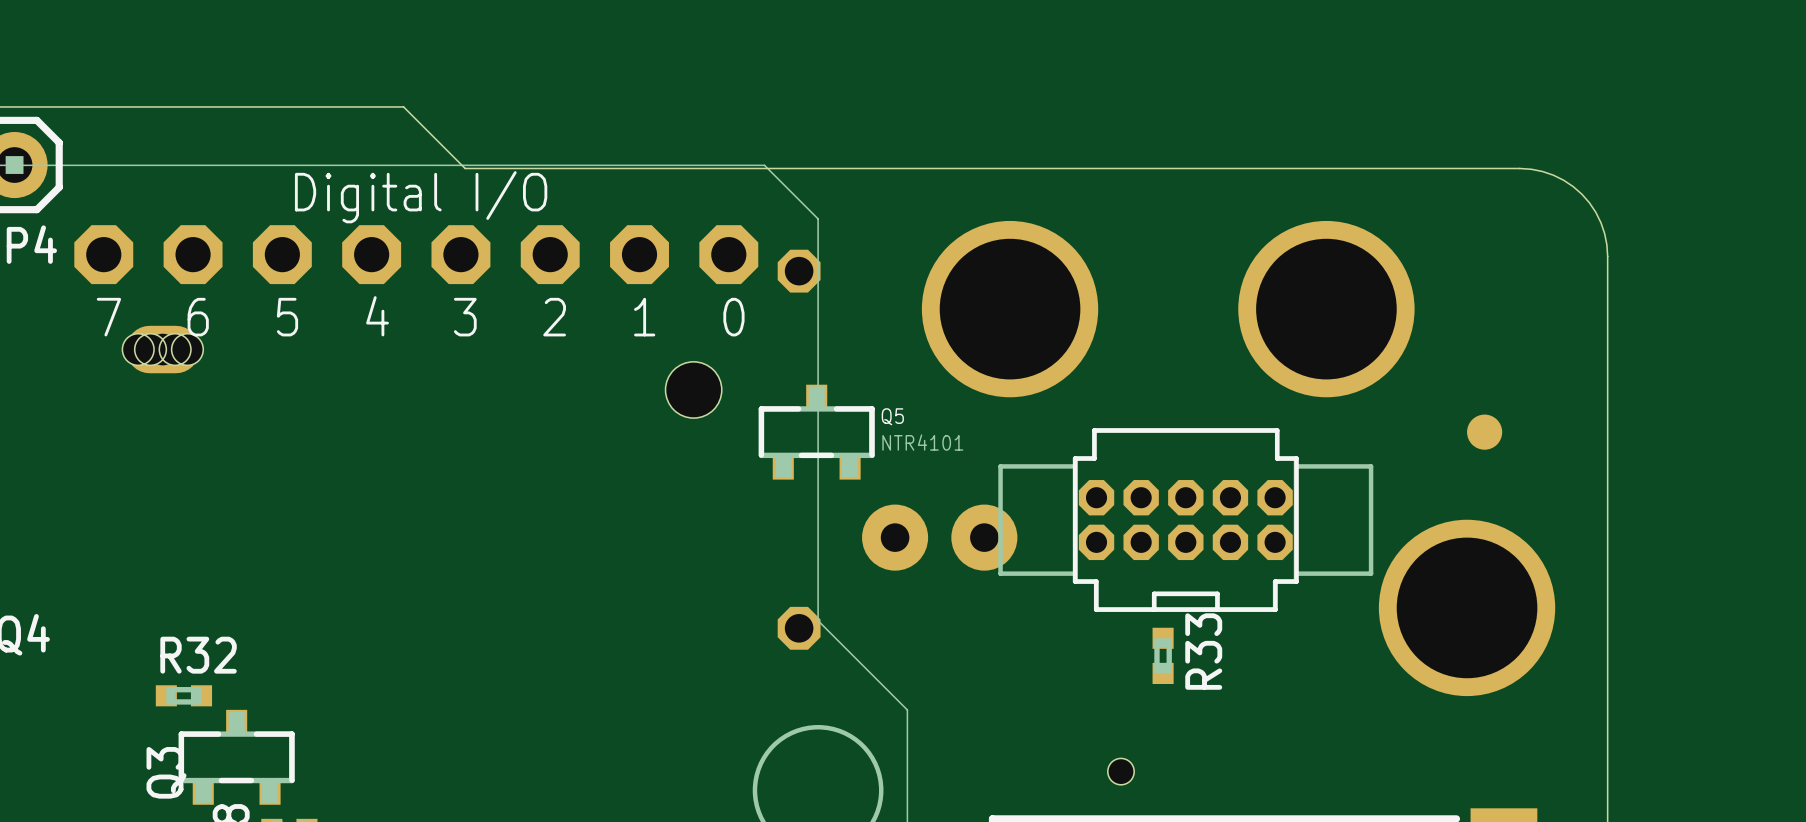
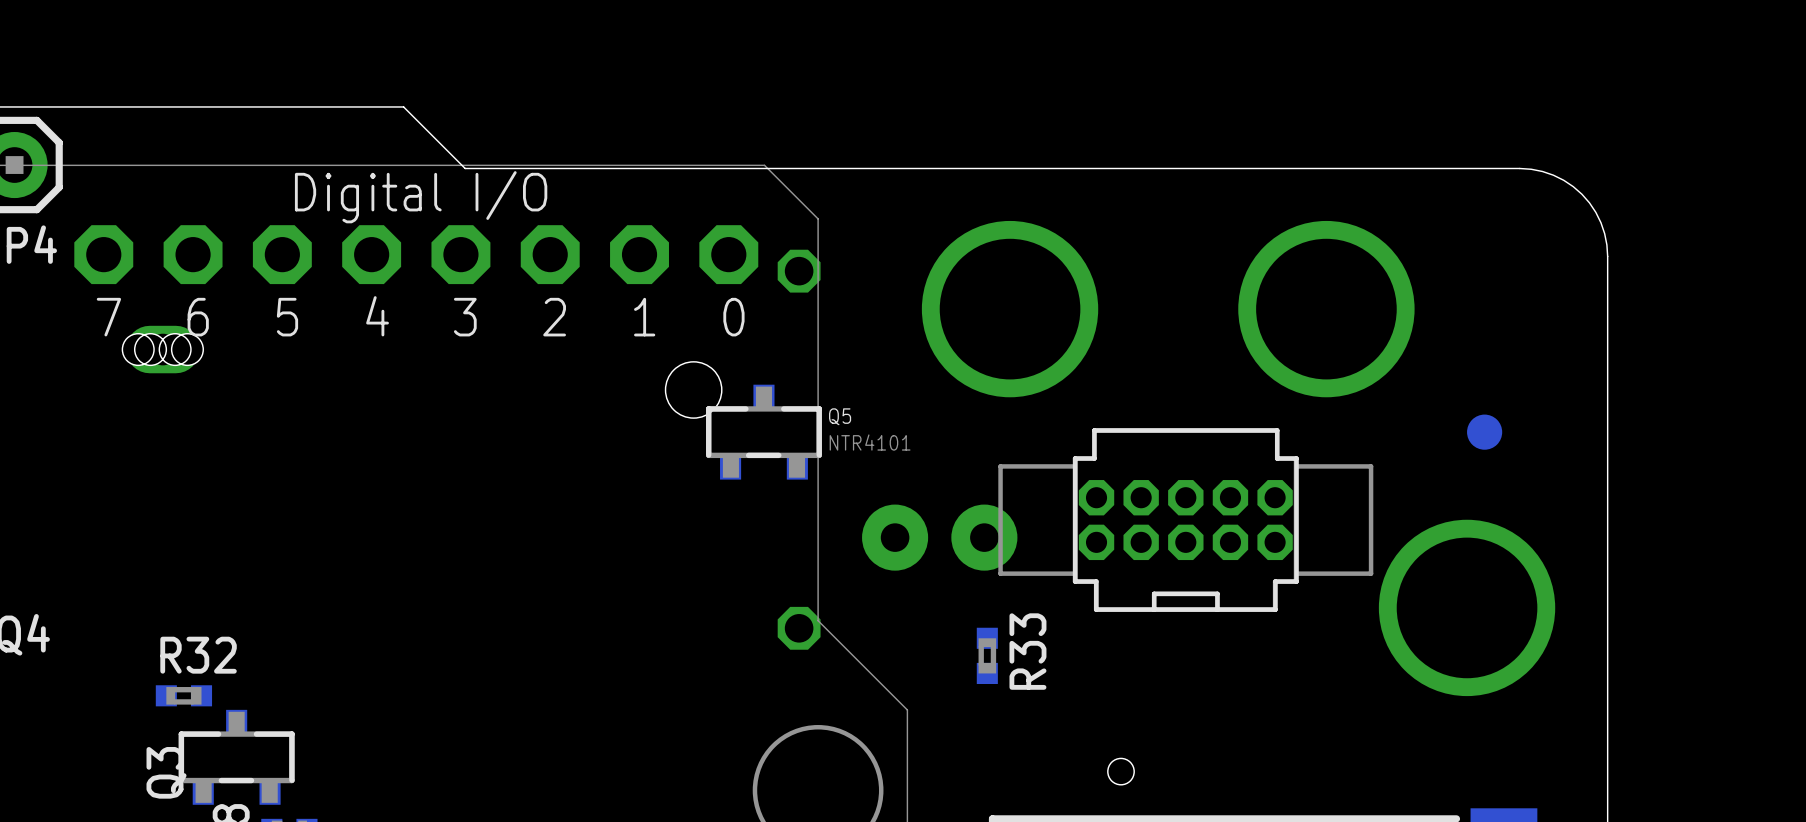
Q5 position: (816, 432) -> (763, 432)
R33 position: (1163, 655) -> (987, 655)

